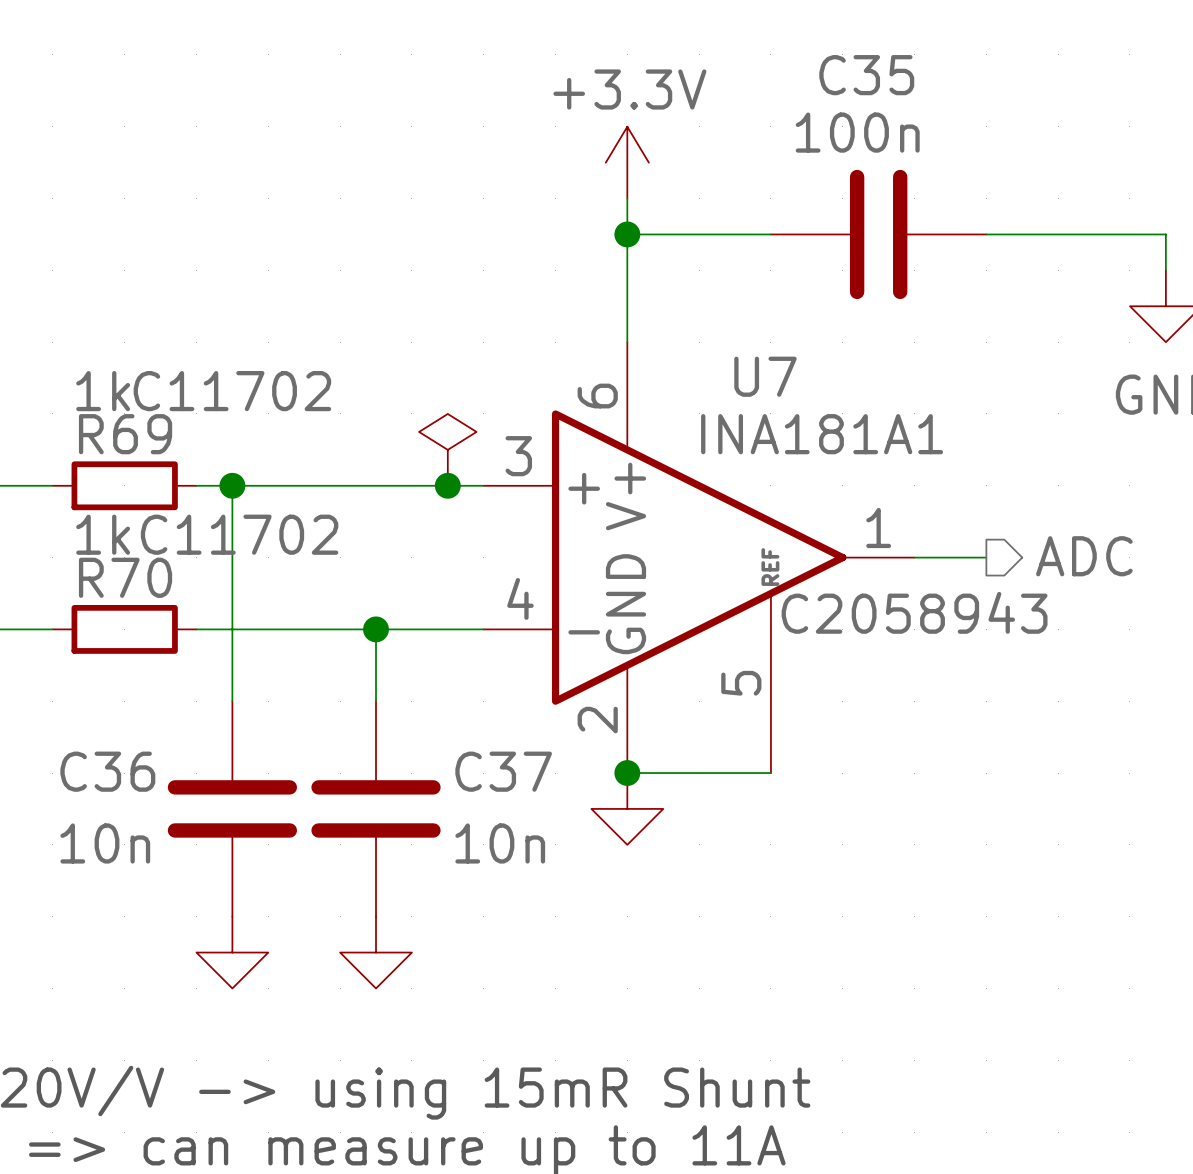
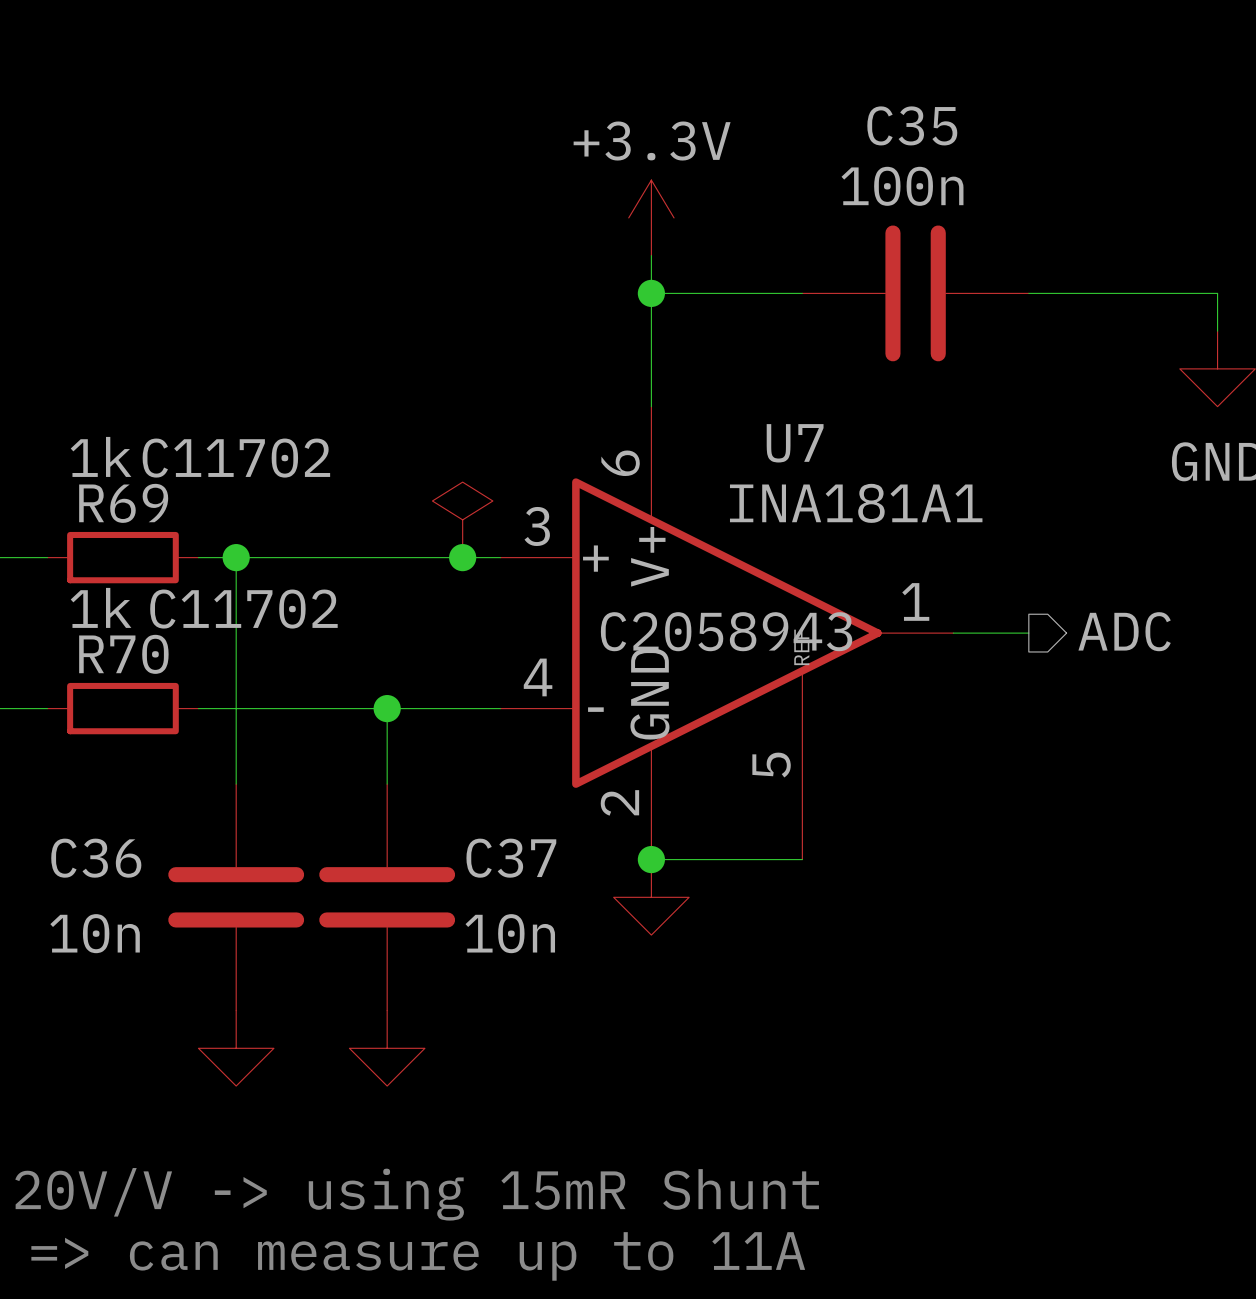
U7 text position: C2058943 (914, 612) -> C2058943 (726, 631)

